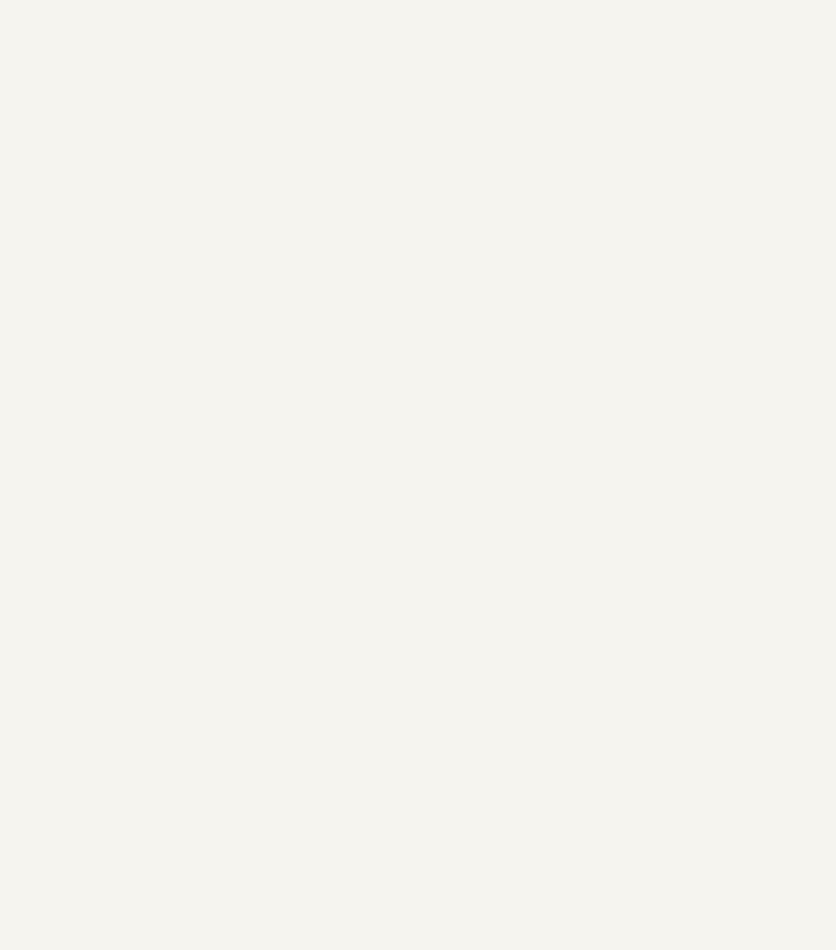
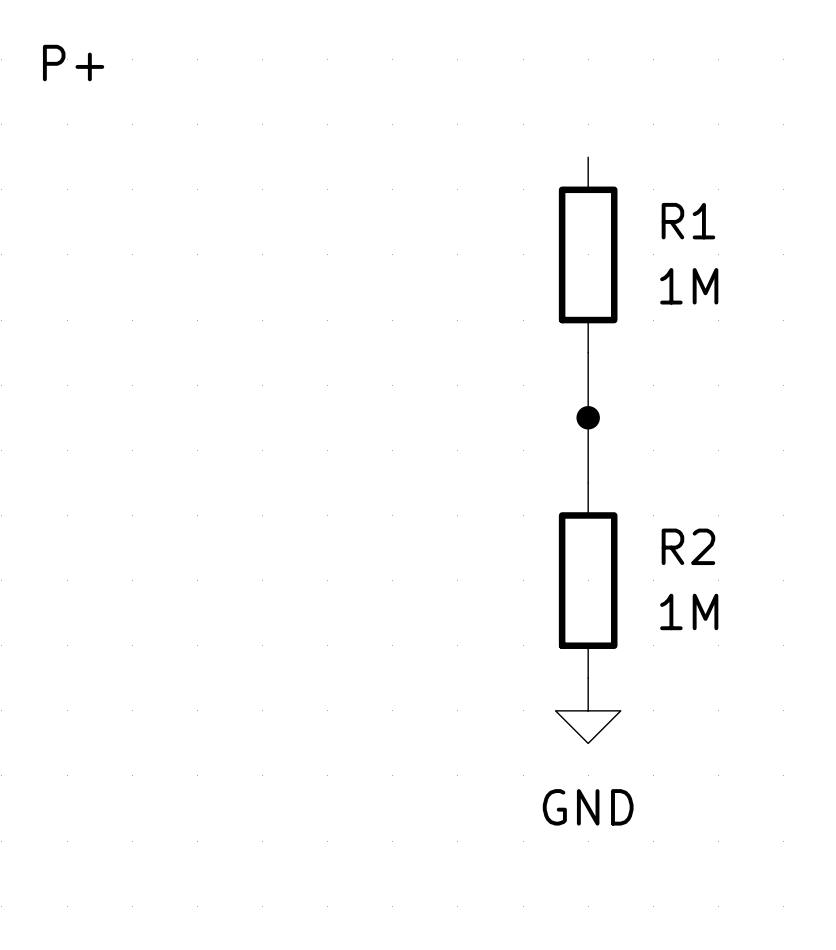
label: none -> P+ (73, 63)
R1: none -> 1M (588, 254)
wire: none -> (588, 352) (588, 482)
junction: none -> (588, 417)
R2: none -> 1M (588, 580)
power symbol: none -> GND (588, 710)

